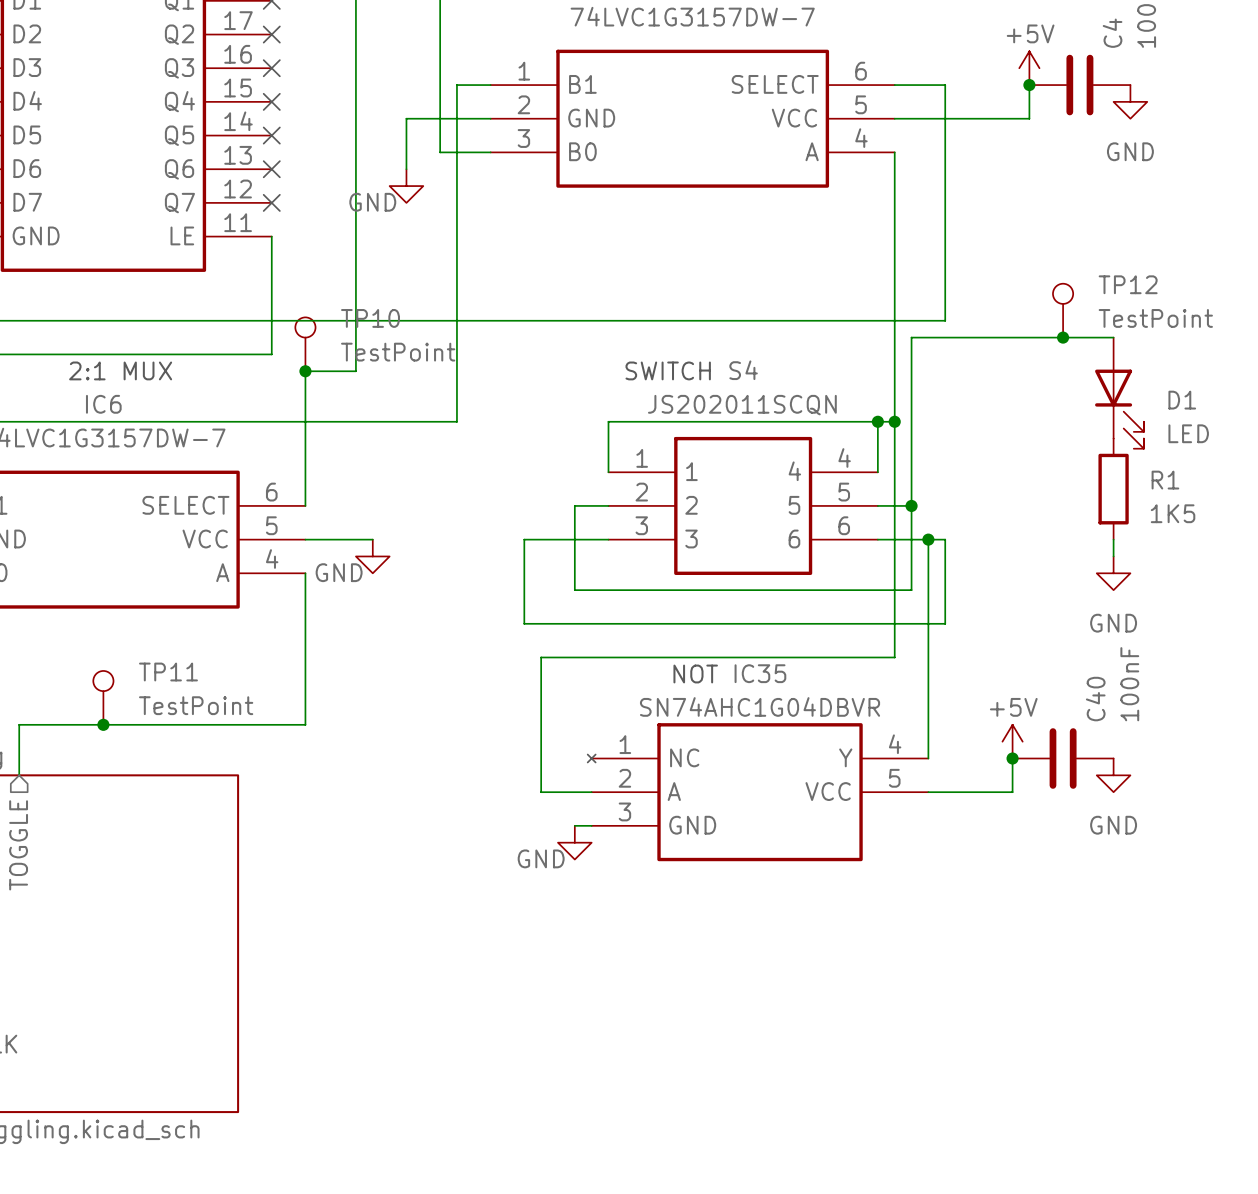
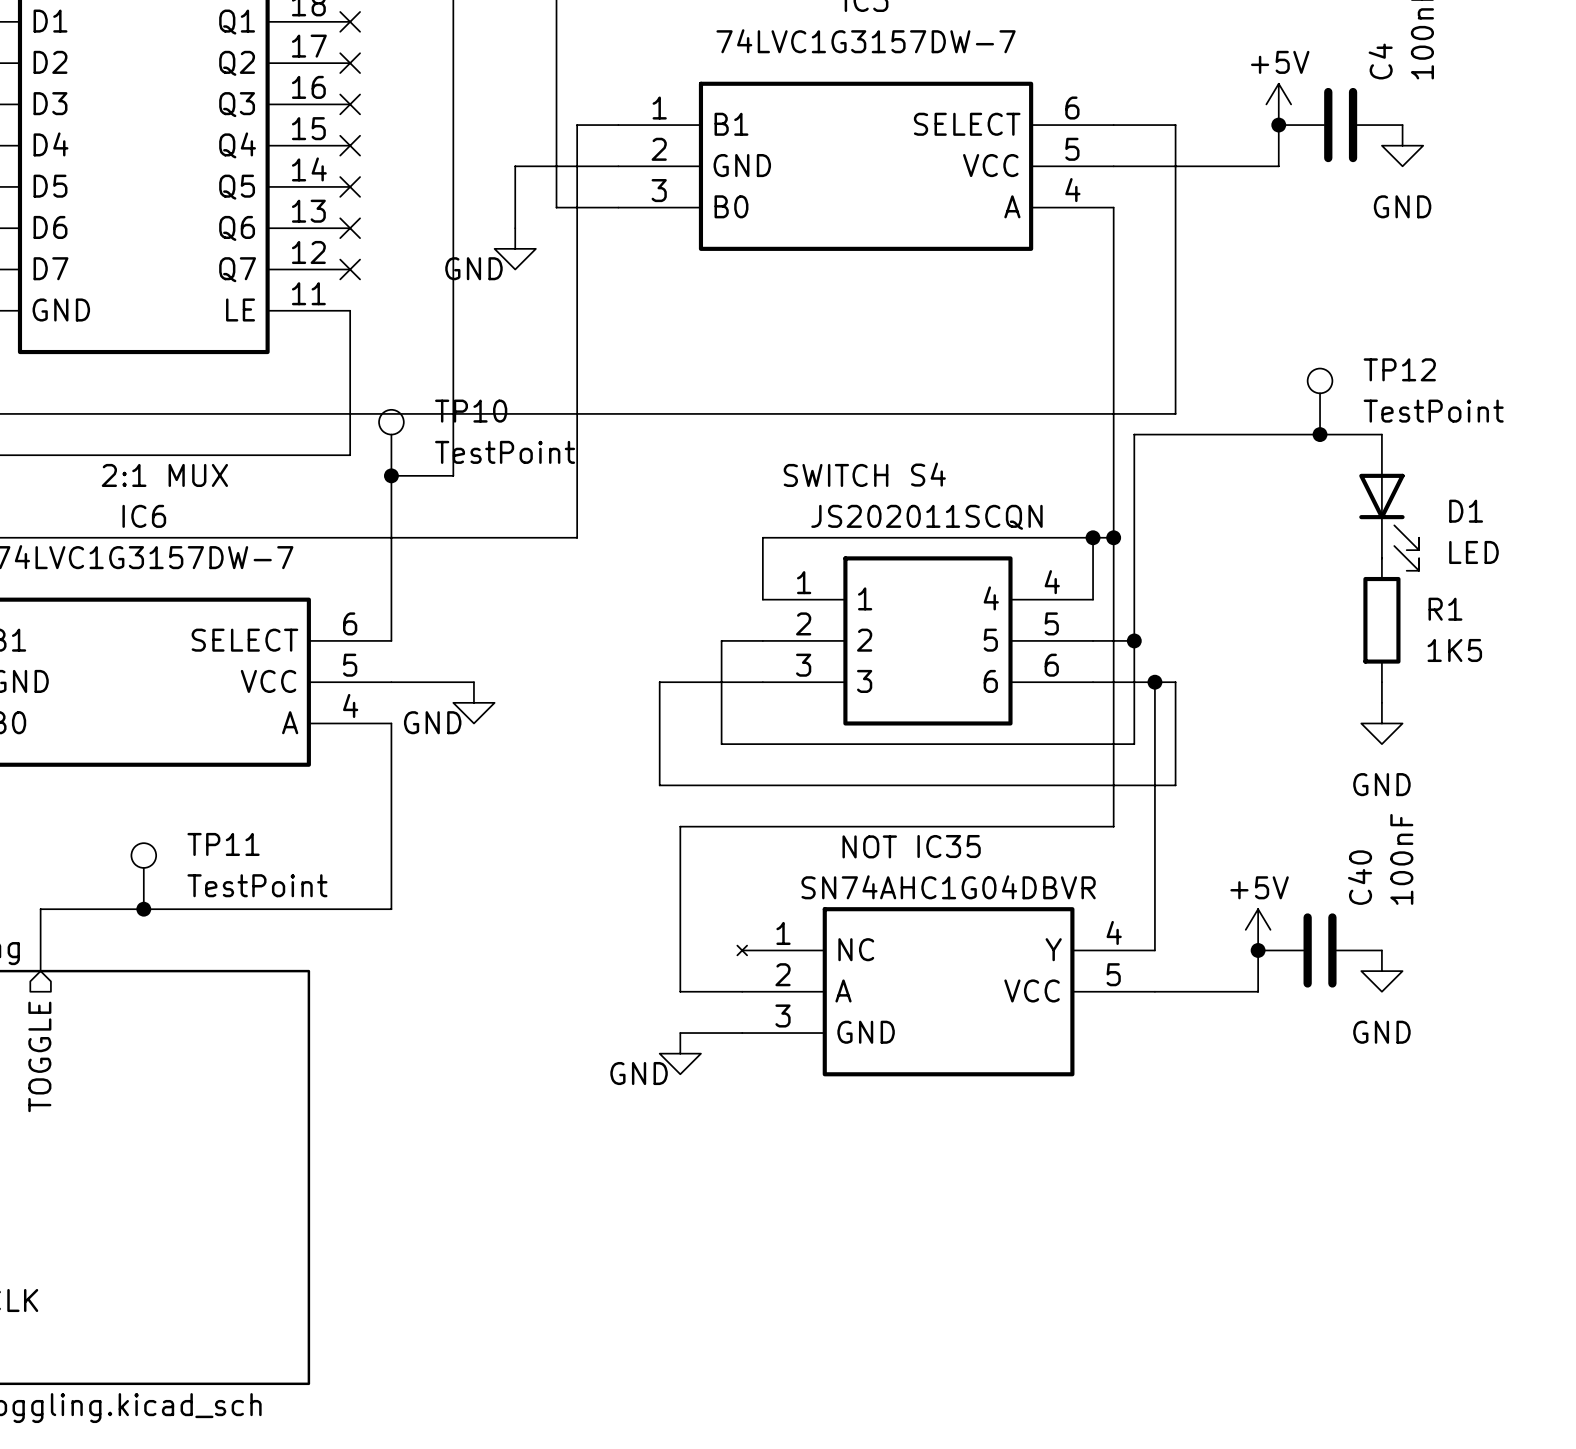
wire: none -> (680, 1033) (721, 1033)
power symbol position: GND (574, 842) -> GND (680, 1053)

